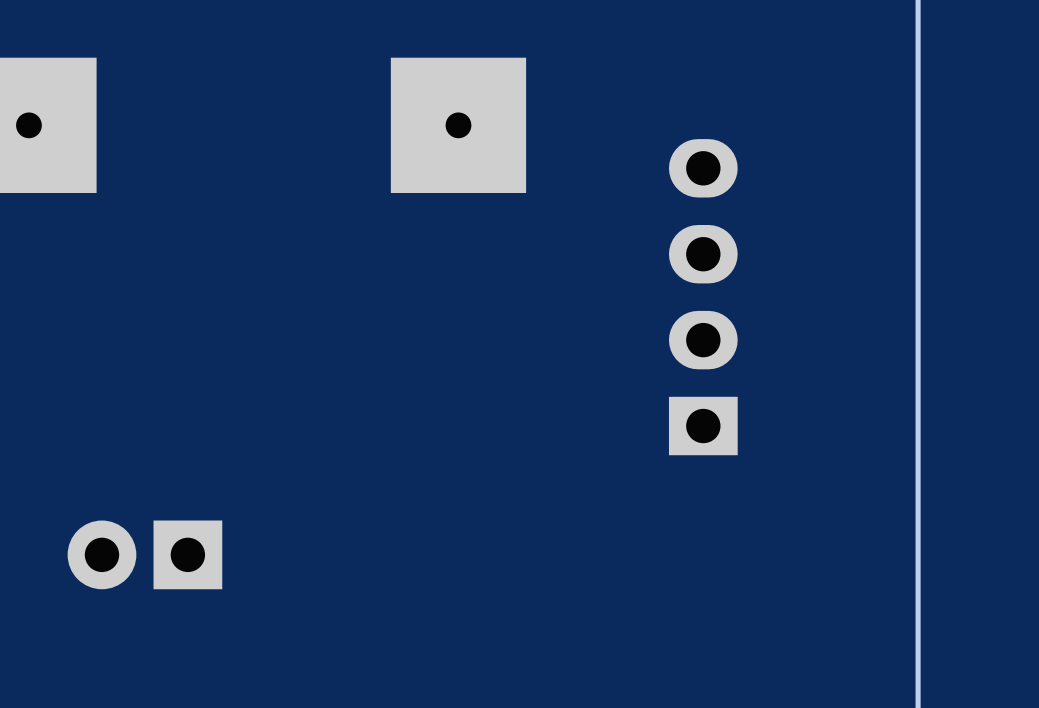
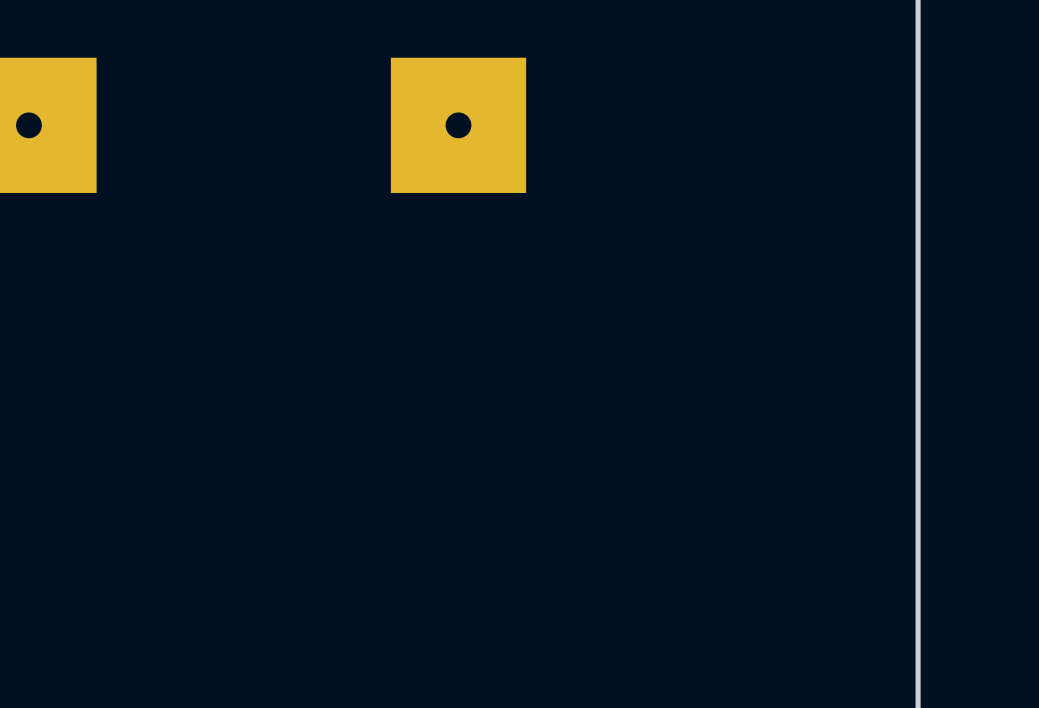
part: (703, 297) -> none
part: (144, 554) -> none

